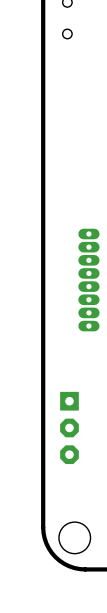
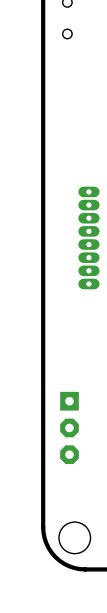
part position: (88, 280) -> (88, 237)

